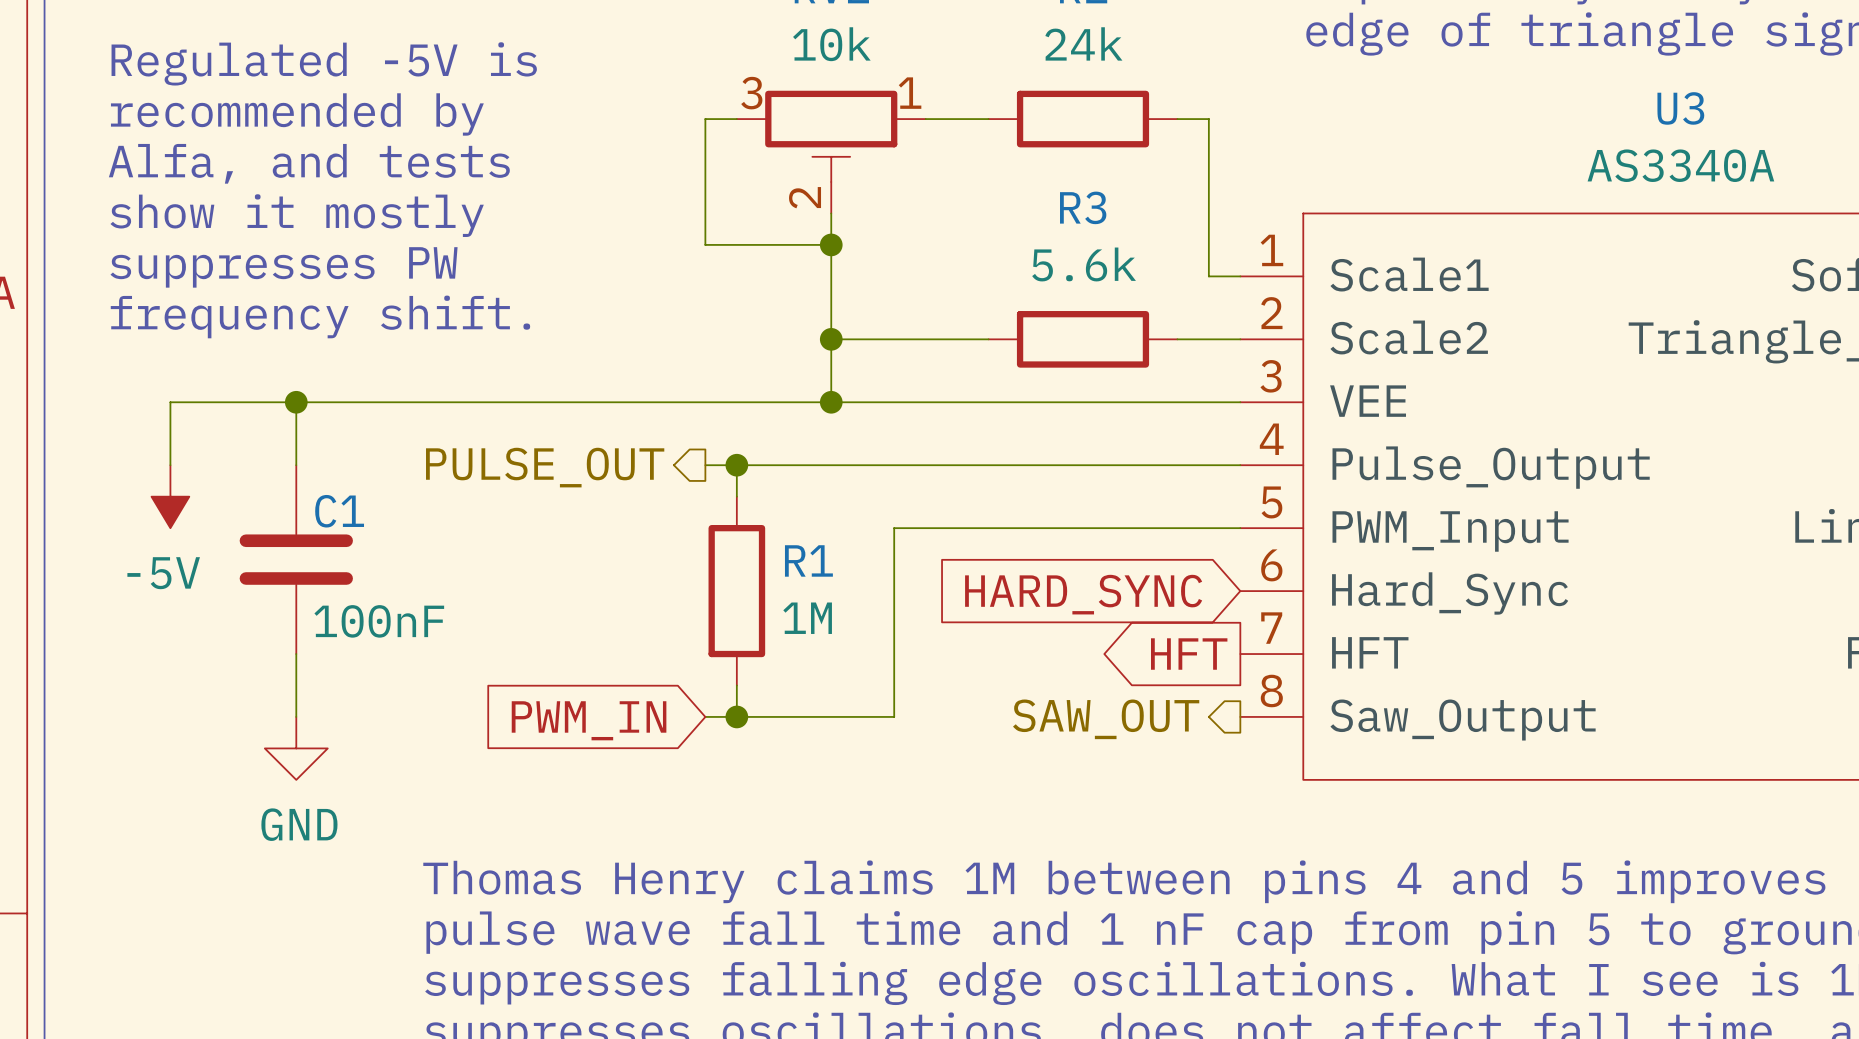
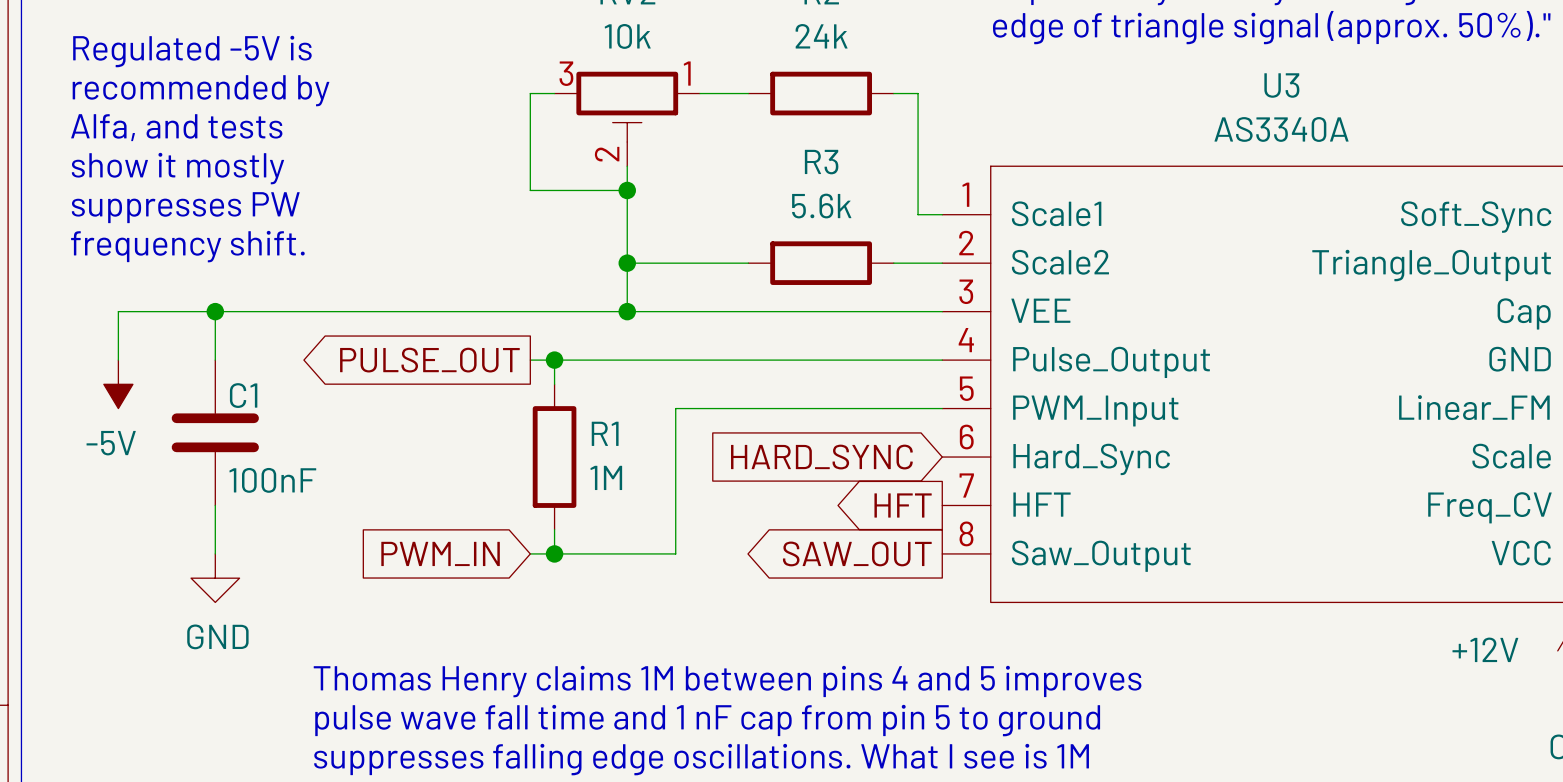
hierarchical label: PULSE_OUT (545, 467) -> none
global label: none -> PULSE_OUT (429, 360)
hierarchical label: SAW_OUT (1106, 719) -> none
global label: none -> SAW_OUT (857, 553)

